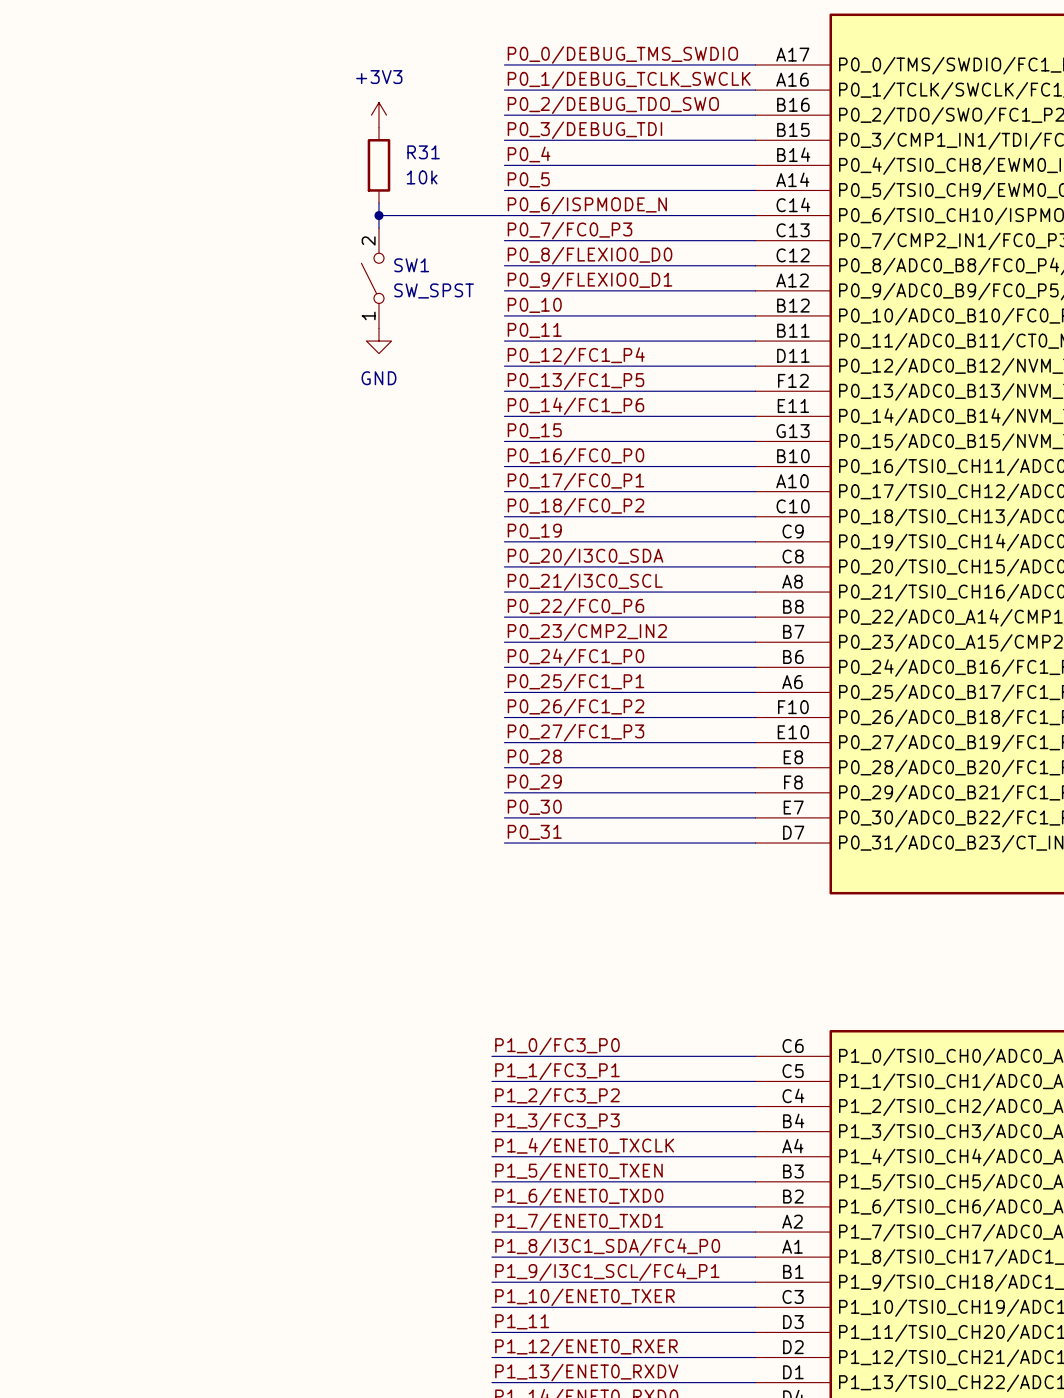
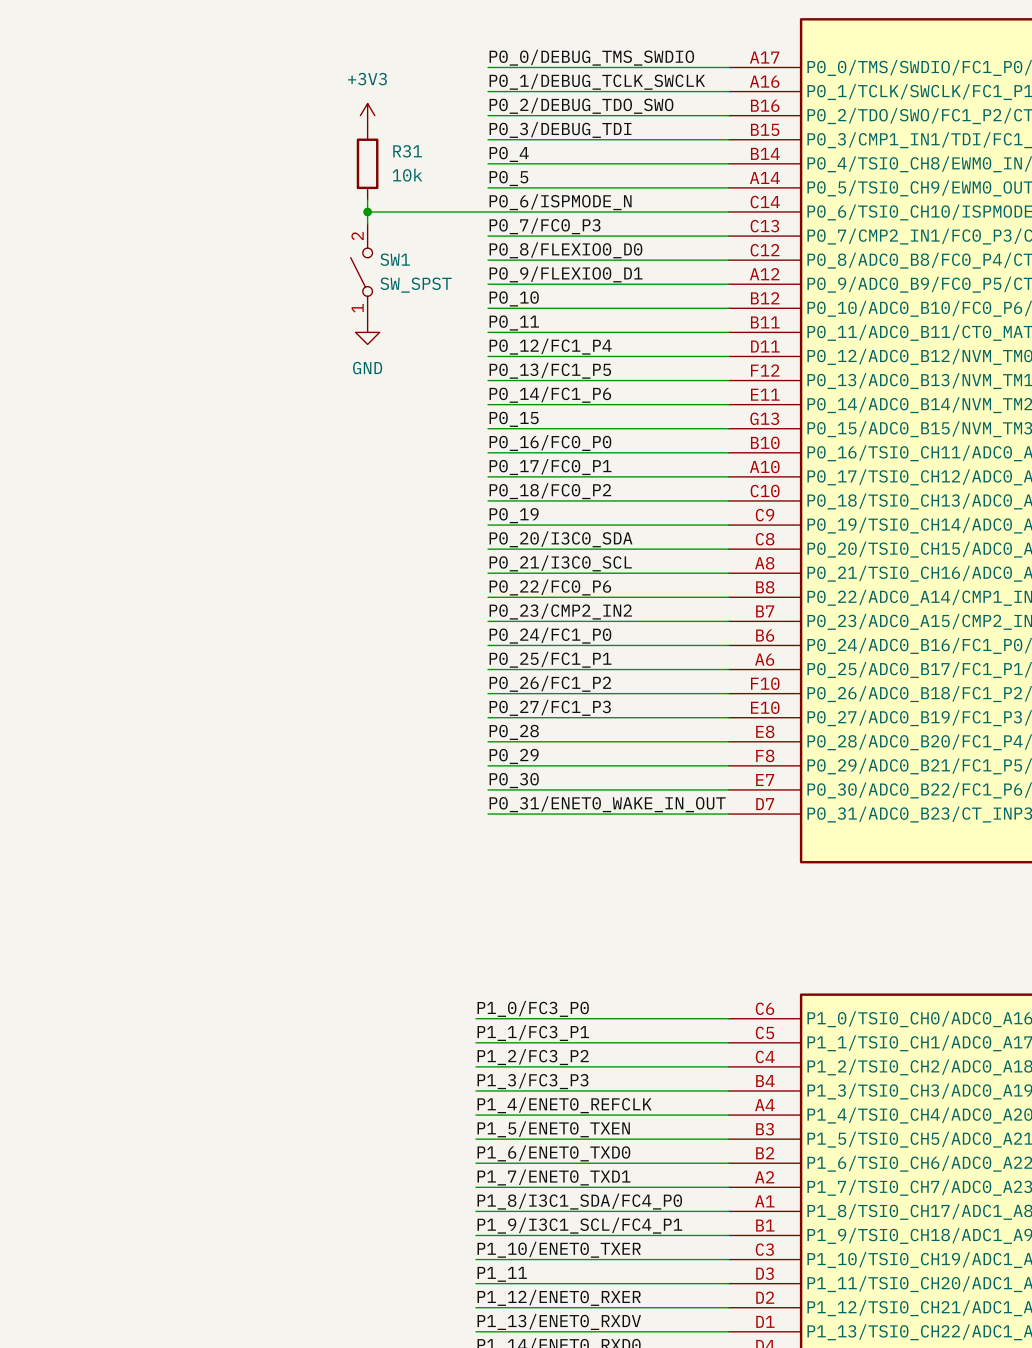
label: P0_31 (534, 832) -> P0_31/ENET0_WAKE_IN_OUT (607, 804)
label: P1_4/ENET0_TXCLK (584, 1146) -> P1_4/ENET0_REFCLK (564, 1105)

